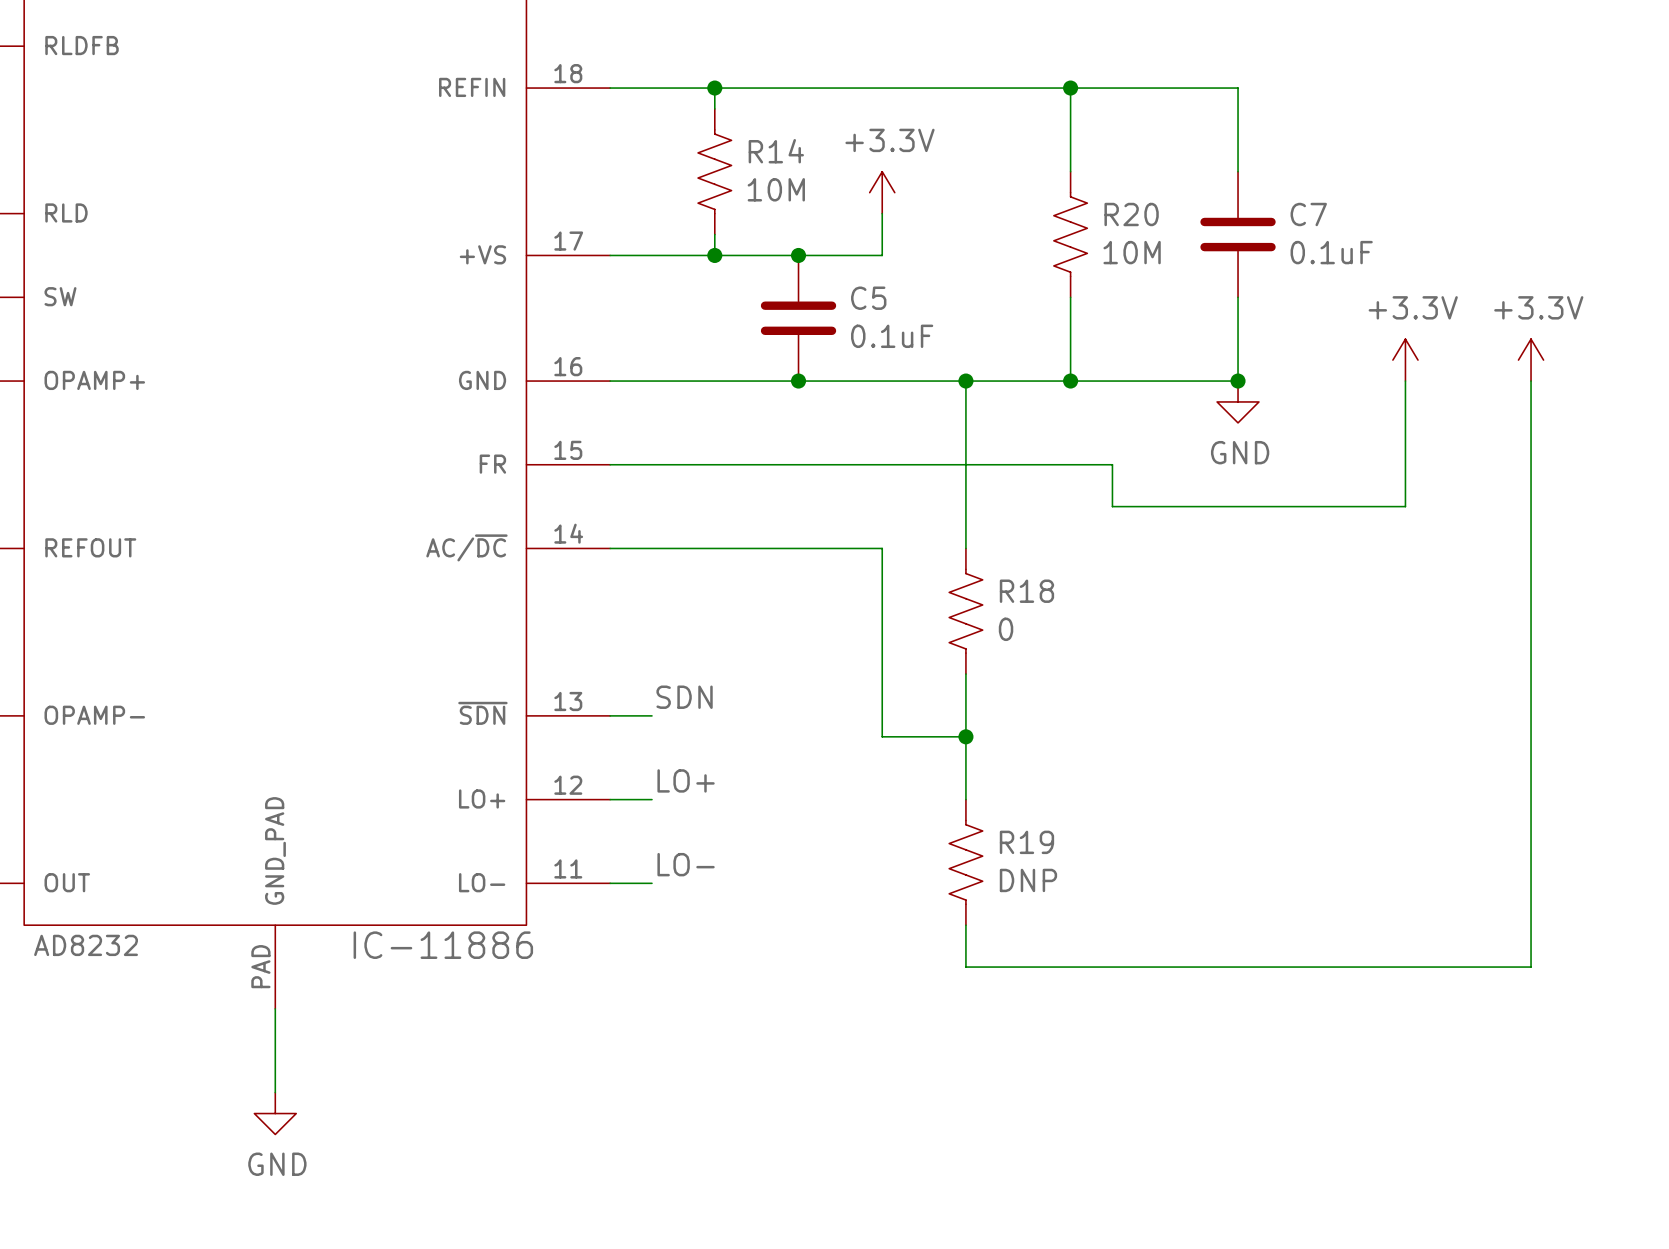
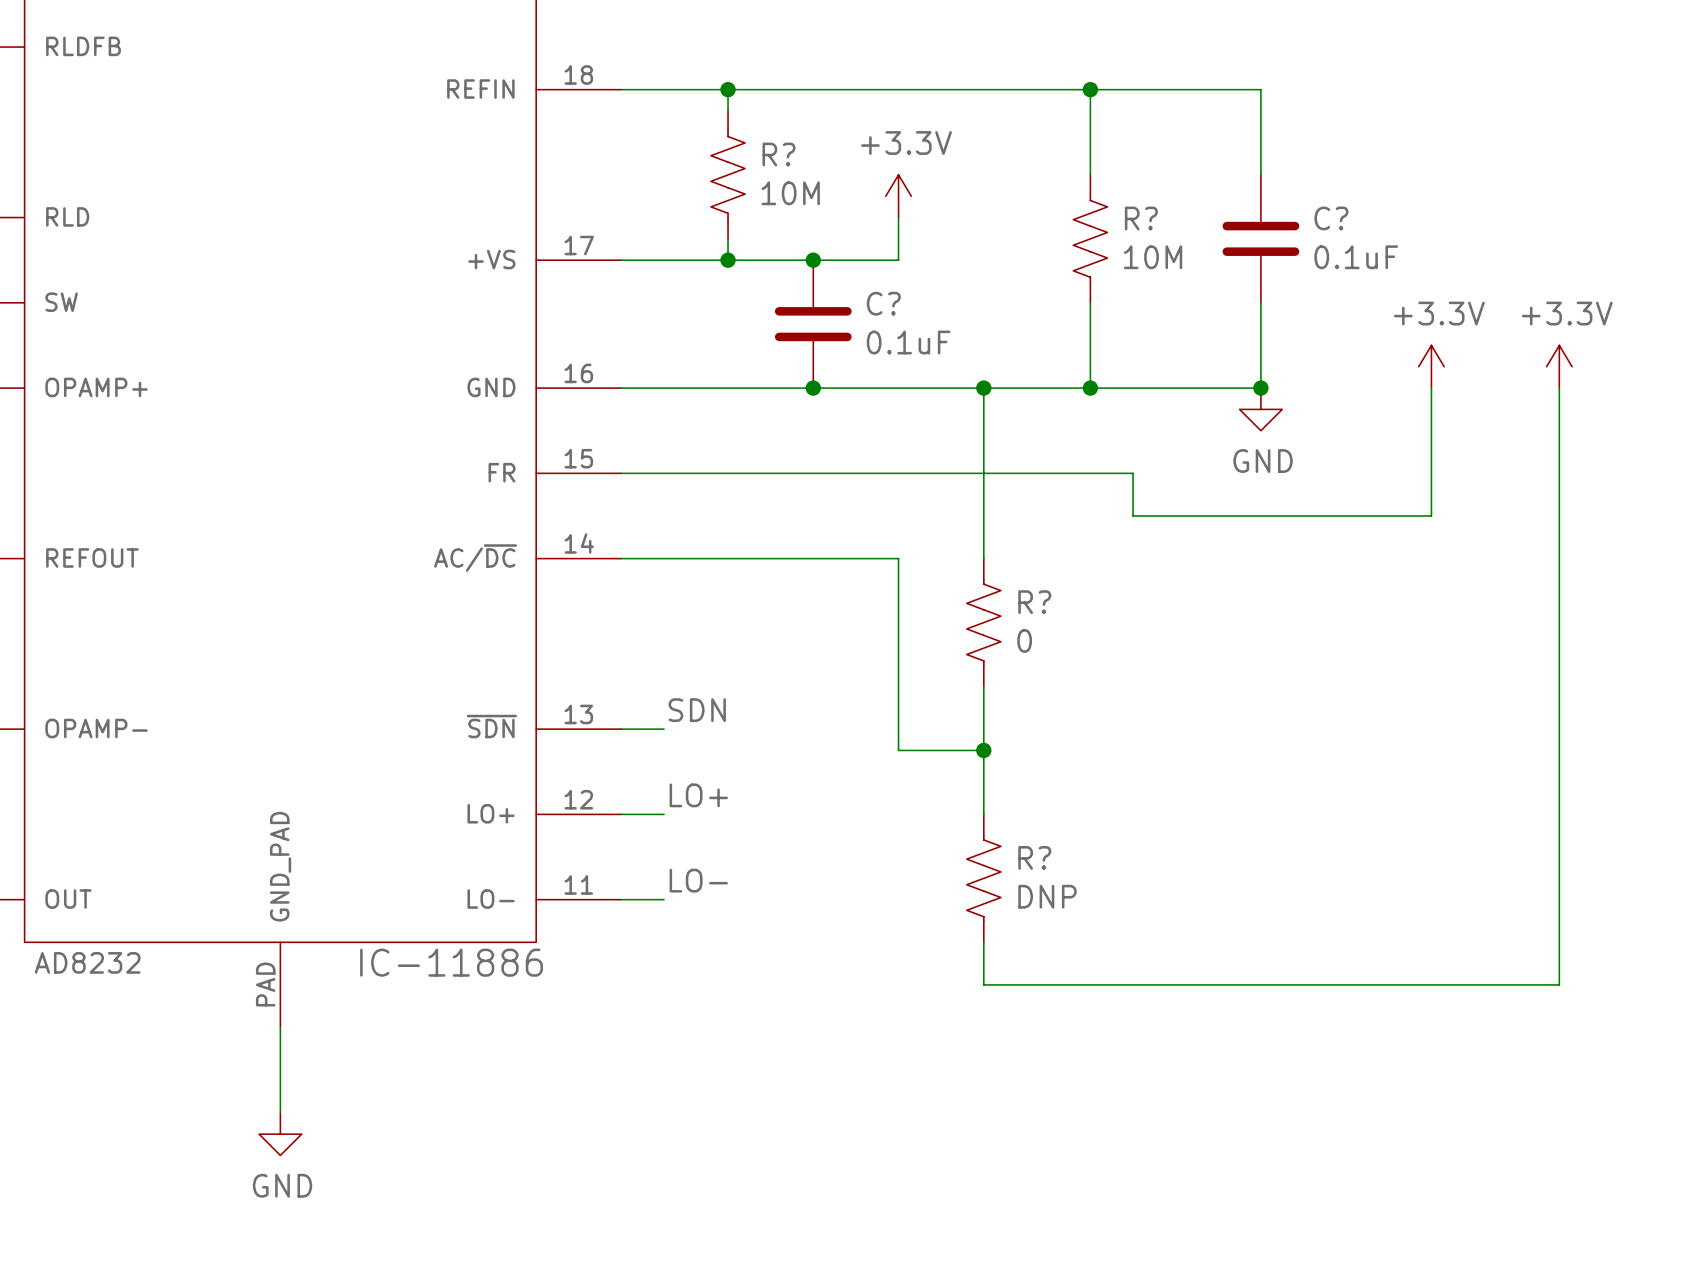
R14 name: R14 (776, 151) -> R? (778, 154)
R20 name: R20 (1131, 214) -> R? (1141, 218)
C7 name: C7 (1308, 214) -> C? (1331, 218)
C5 name: C5 (868, 298) -> C? (883, 303)
R18 name: R18 (1026, 591) -> R? (1034, 602)
R19 name: R19 (1026, 842) -> R? (1034, 857)

